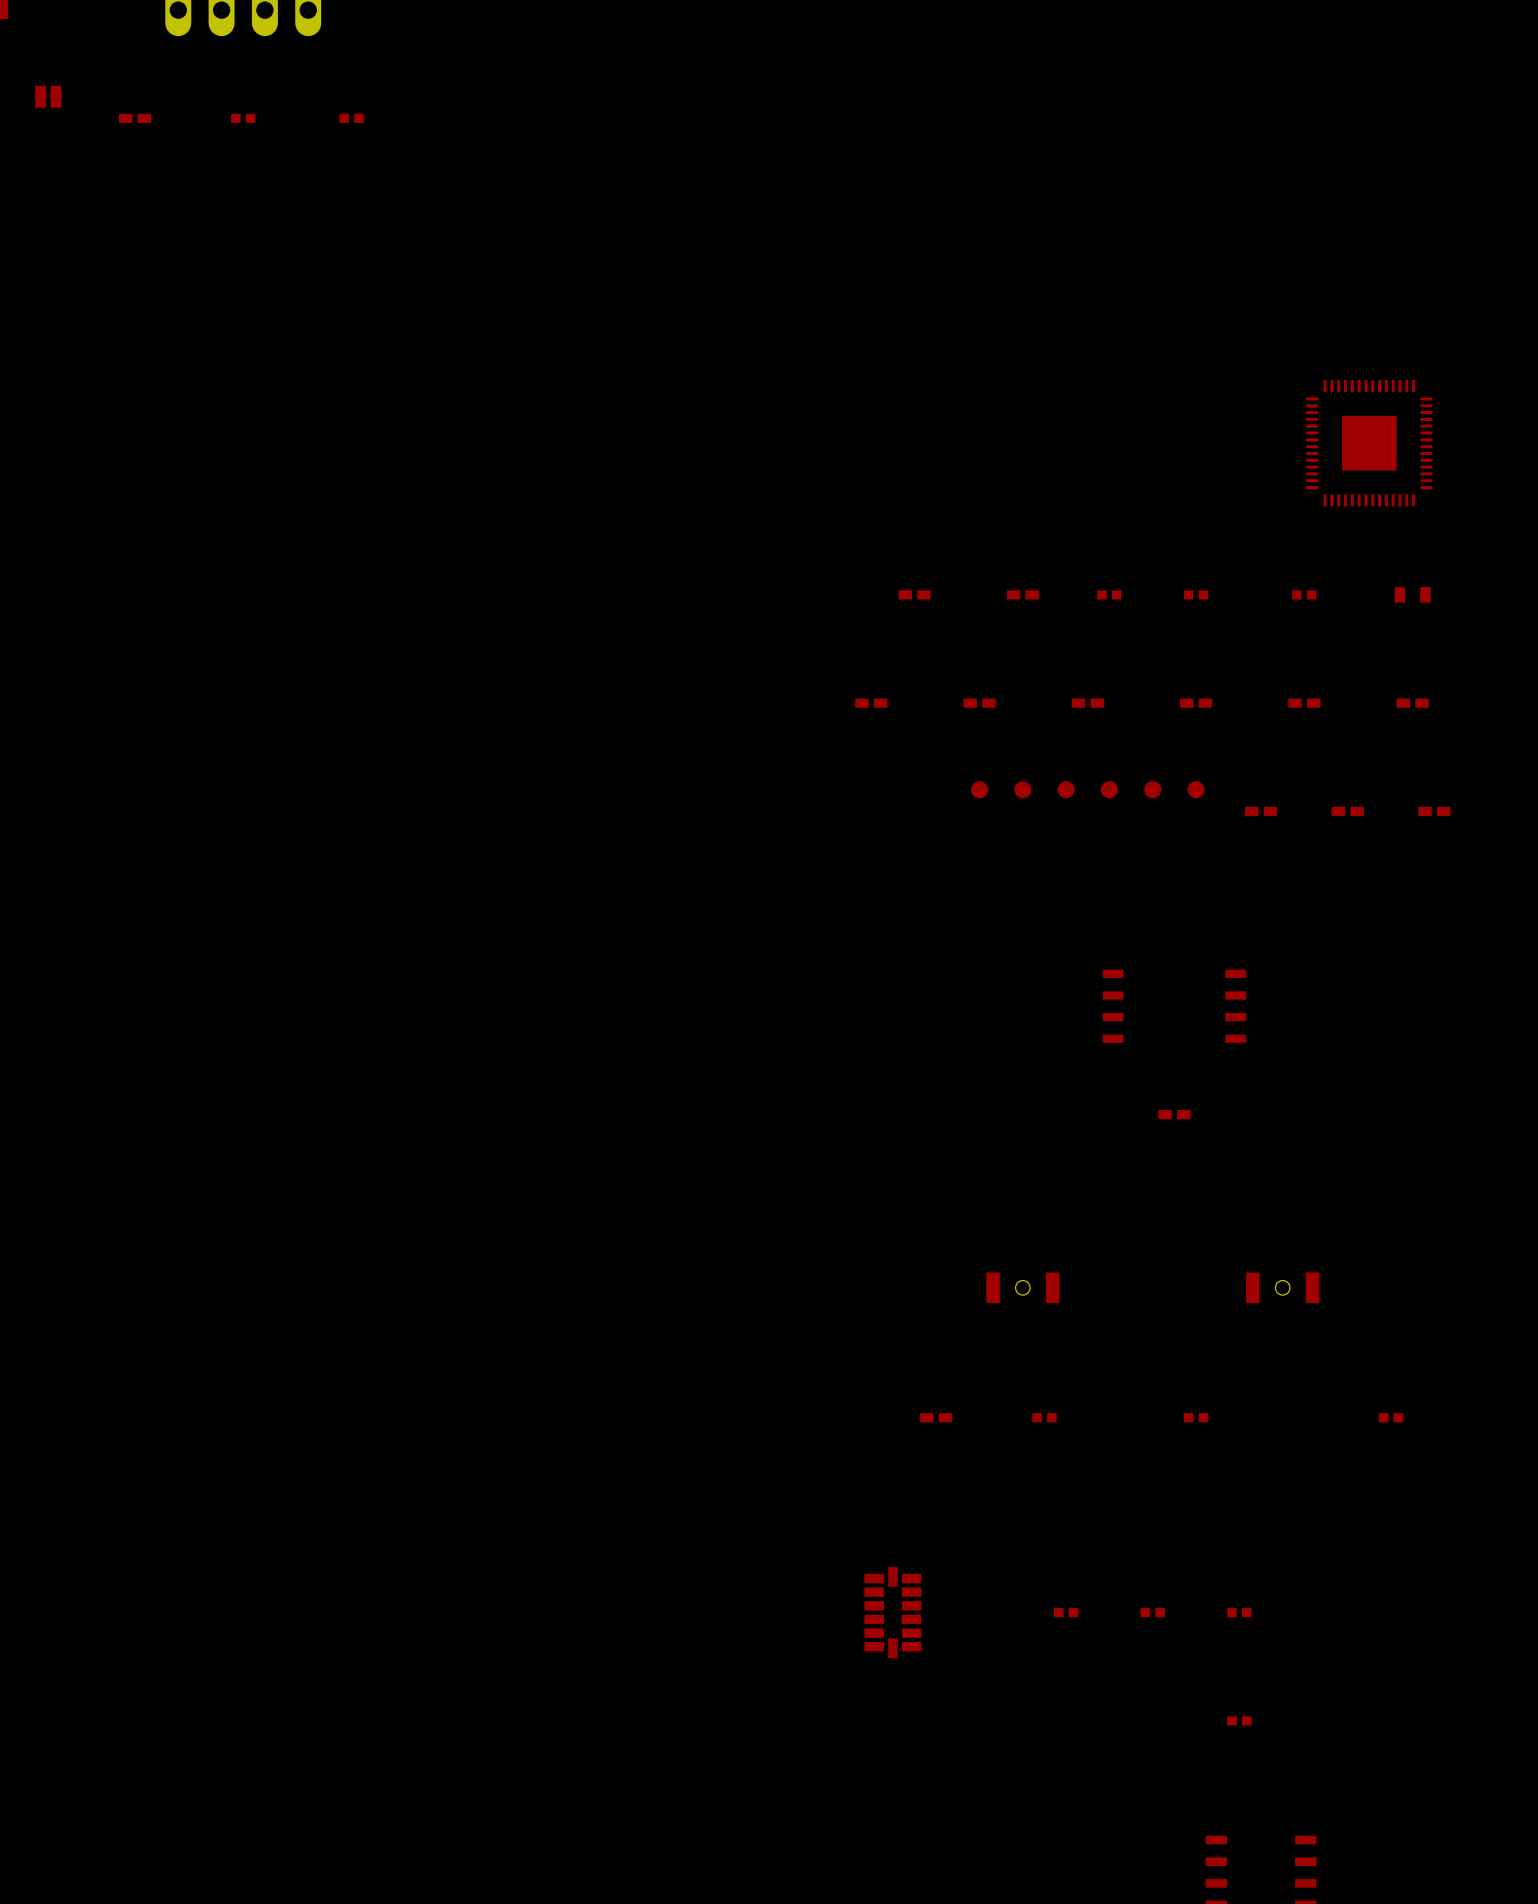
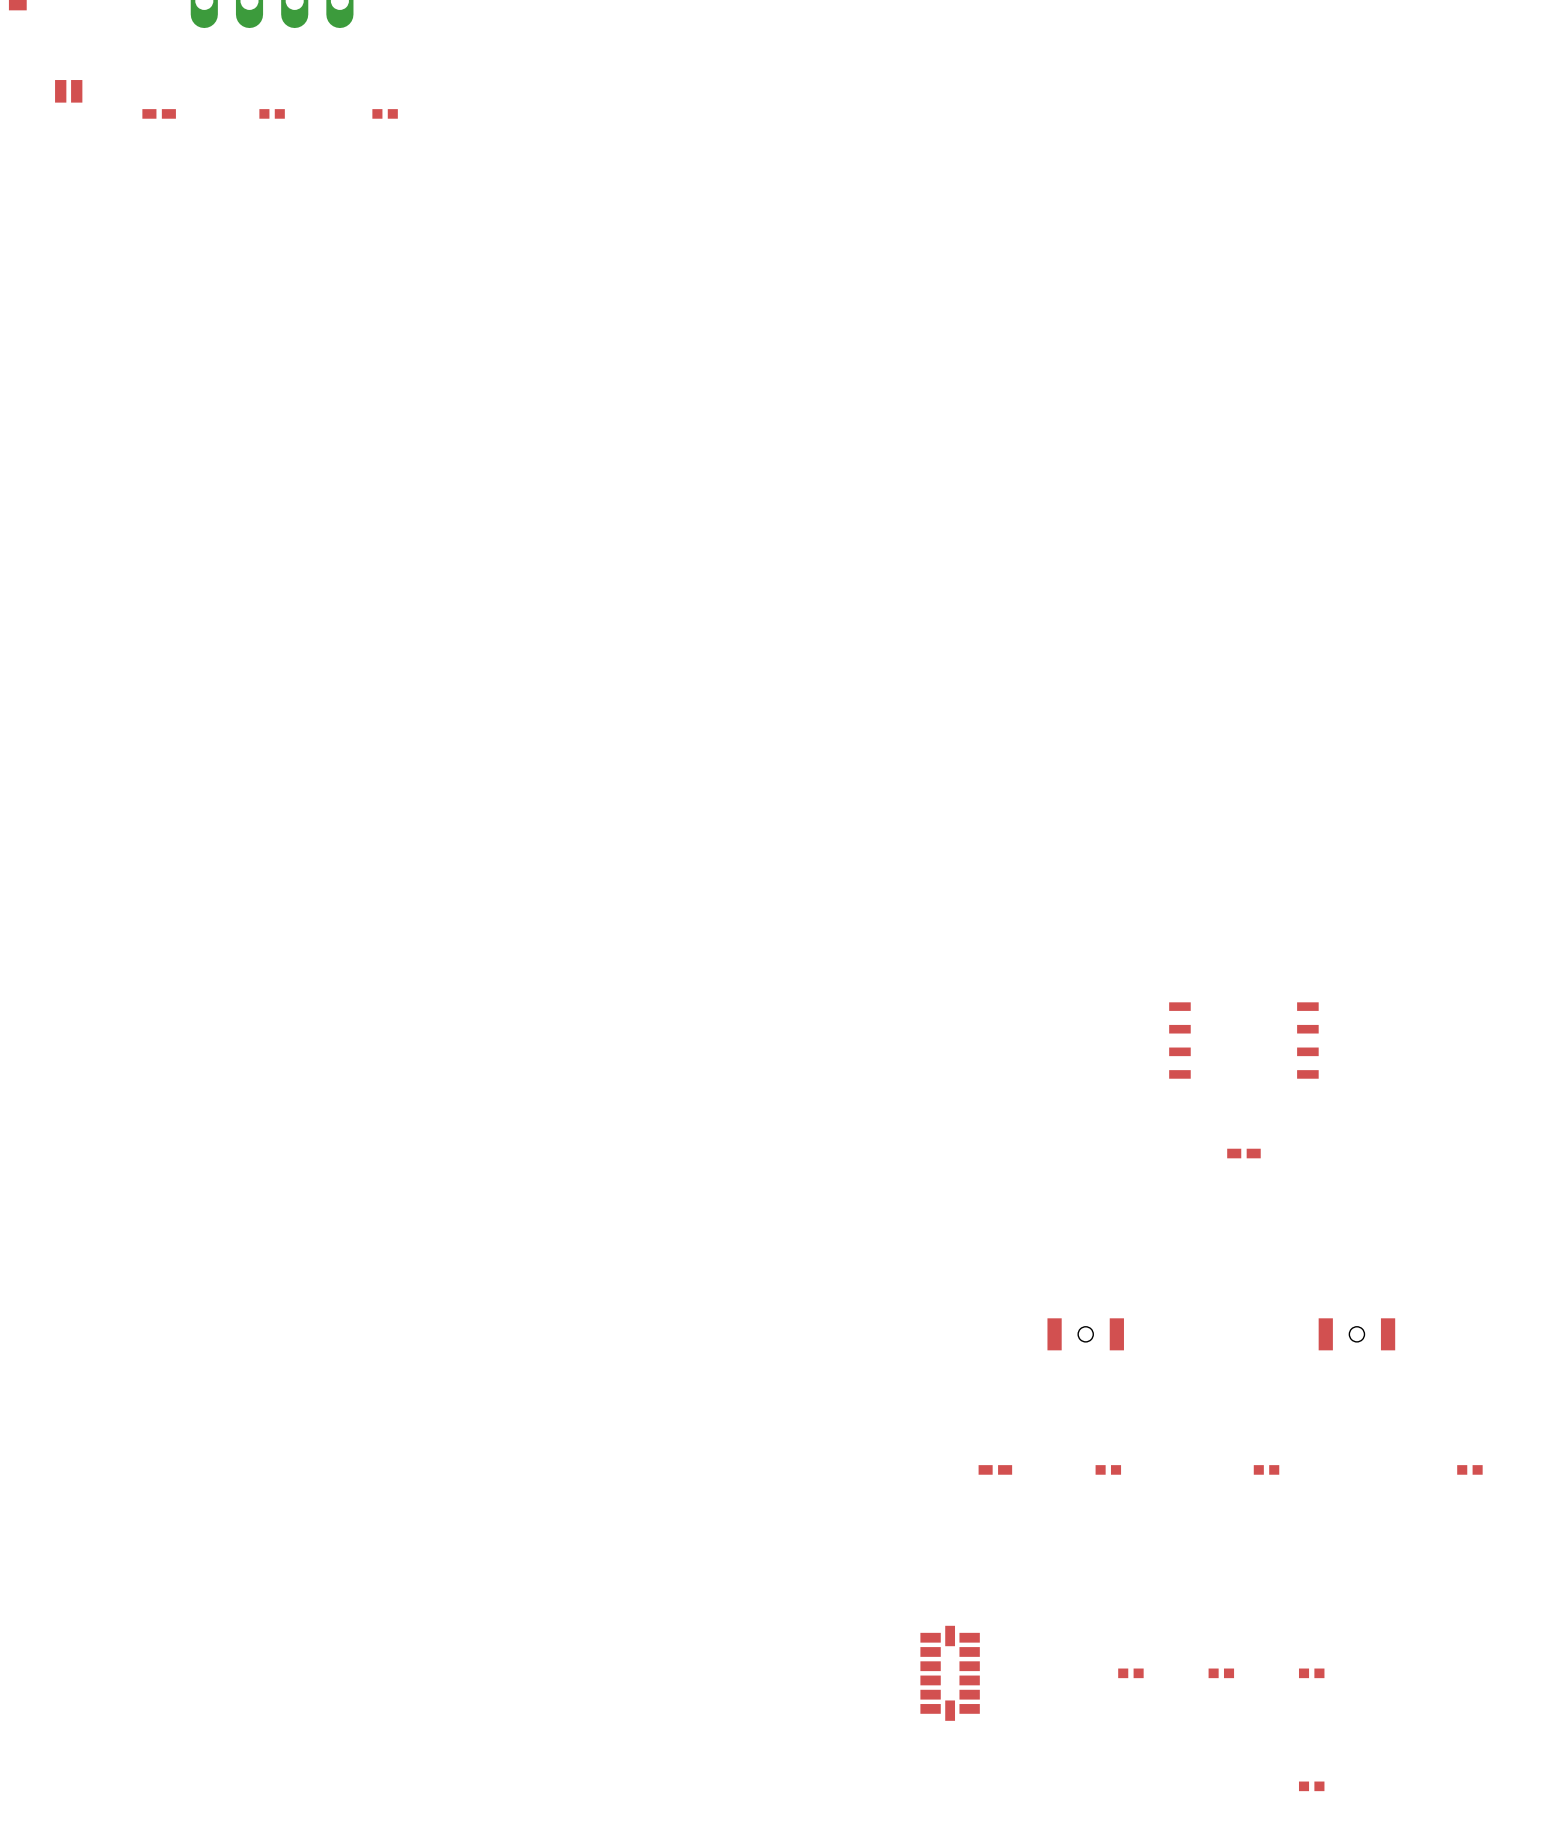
part: (1369, 443) -> none
part: (914, 594) -> none
part: (1022, 594) -> none
part: (1109, 594) -> none
part: (1196, 594) -> none
part: (1304, 594) -> none
part: (1412, 594) -> none
part: (871, 703) -> none
part: (979, 703) -> none
part: (1087, 703) -> none
part: (1196, 703) -> none
part: (1304, 703) -> none
part: (1412, 703) -> none
part: (979, 789) -> none
part: (1022, 789) -> none
part: (1066, 789) -> none
part: (1109, 789) -> none
part: (1152, 789) -> none
part: (1196, 789) -> none
part: (1261, 811) -> none
part: (1347, 811) -> none
part: (1434, 811) -> none

